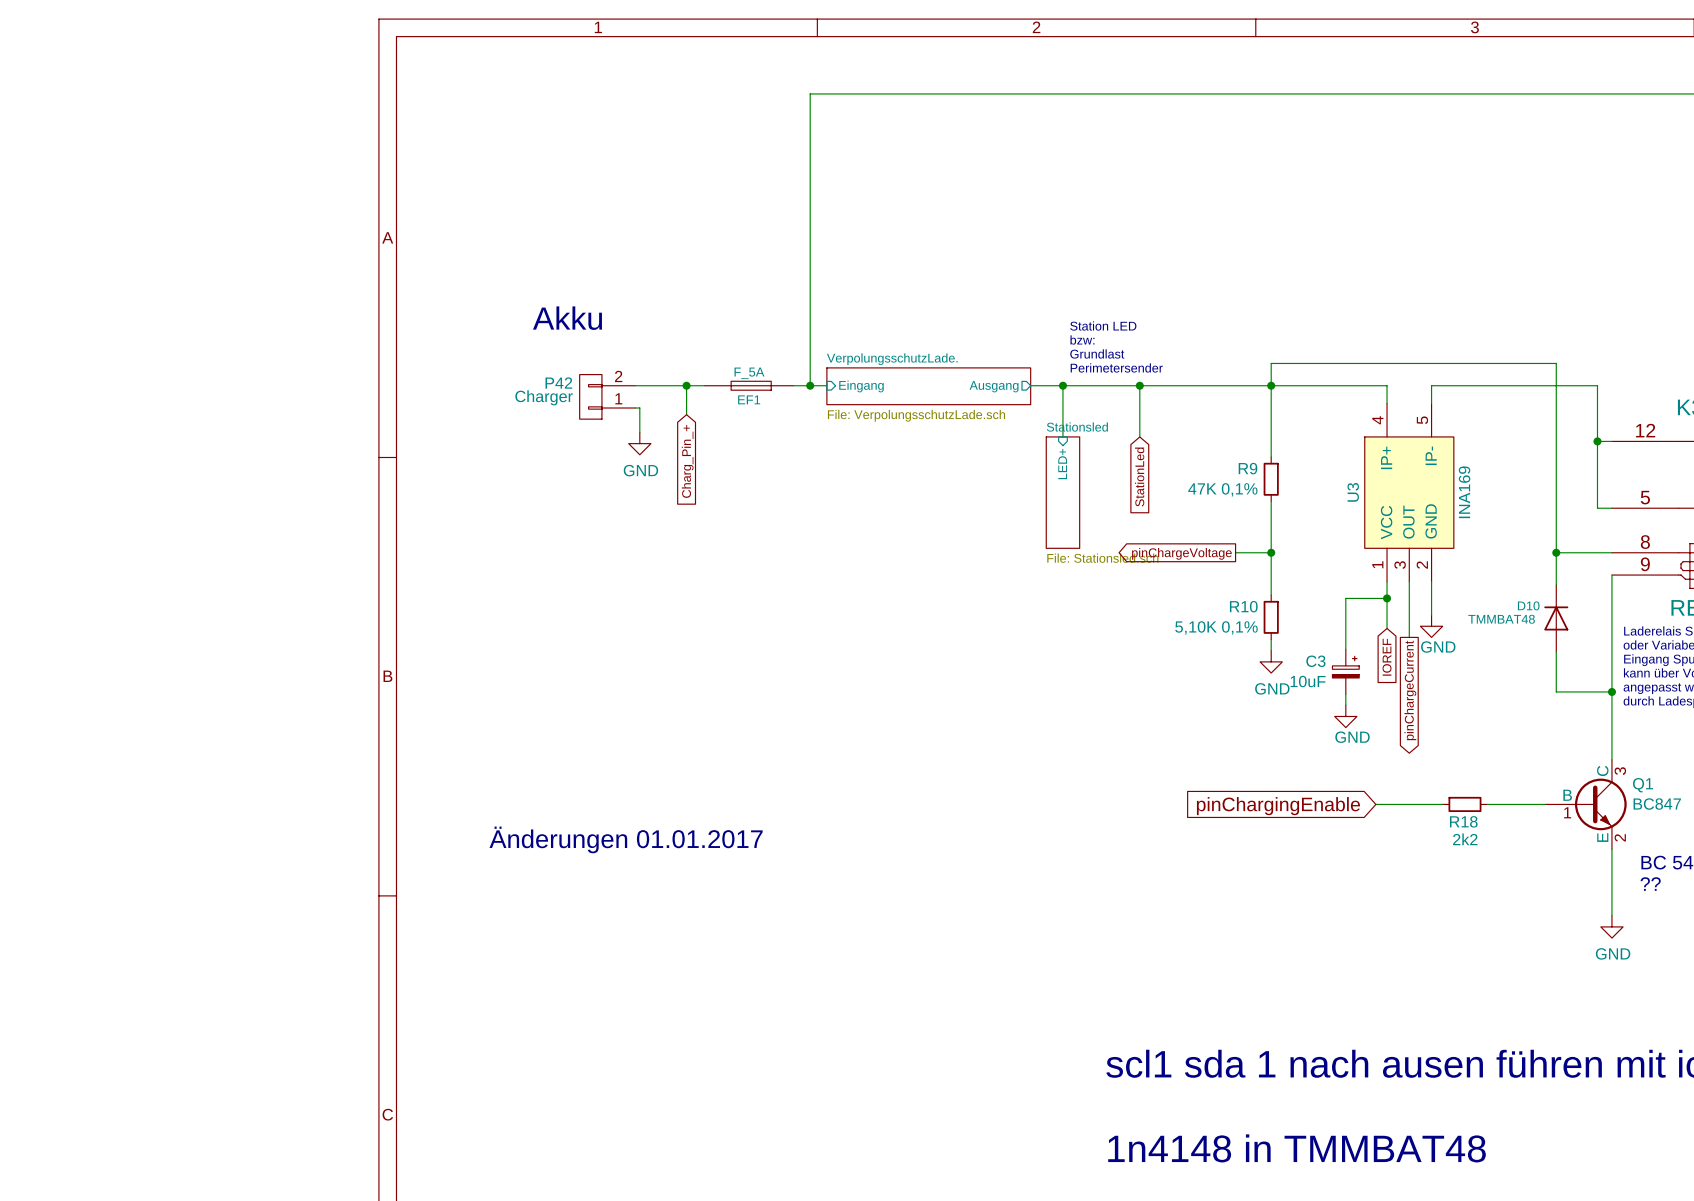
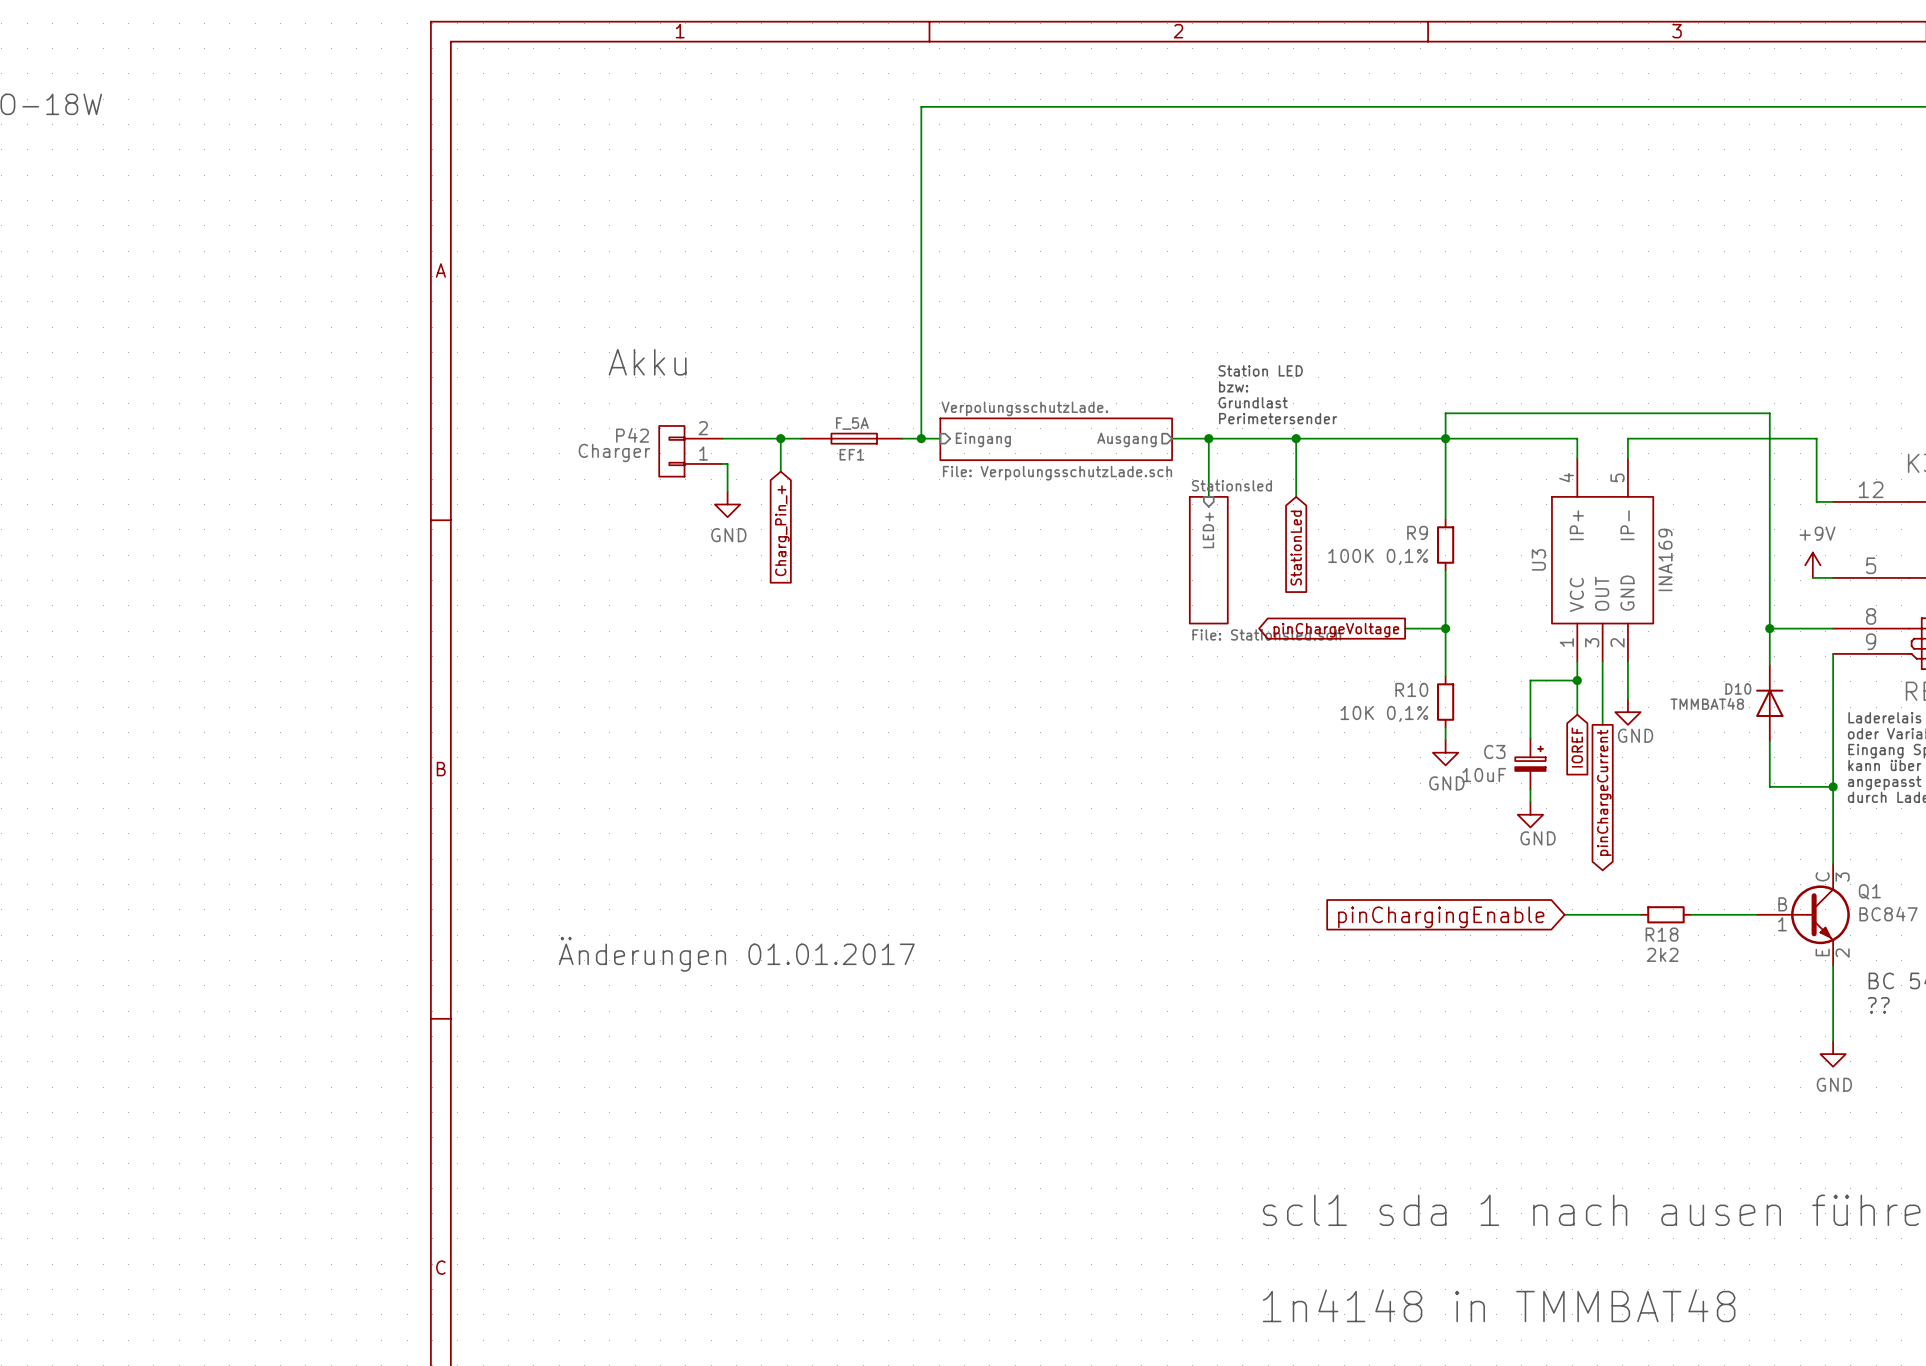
wire: (1597, 441) (1597, 508) -> (1812, 577) (1816, 577)
junction: (1597, 441) -> none
R9 value: 47K 0,1% (1222, 489) -> 100K 0,1% (1378, 556)
power symbol: none -> +9V (1812, 565)
R10 value: 5,10K 0,1% (1216, 627) -> 10K 0,1% (1384, 713)

